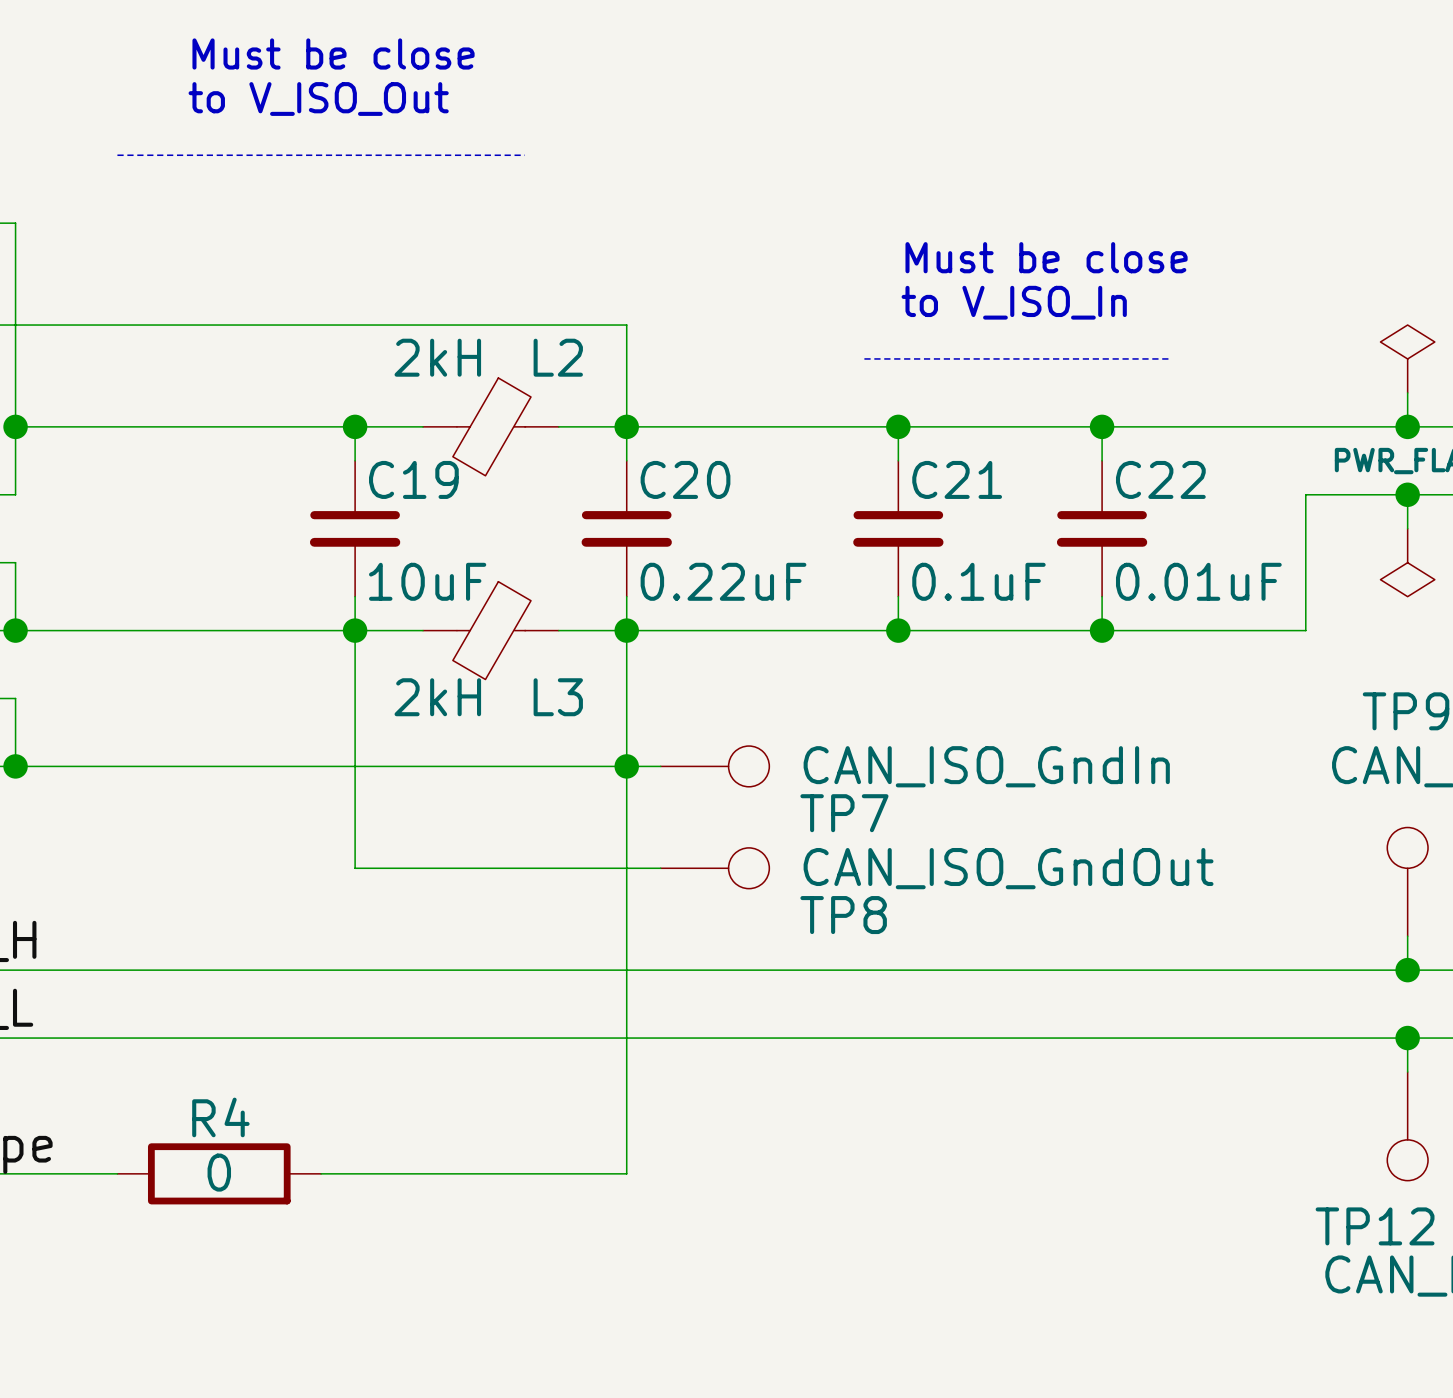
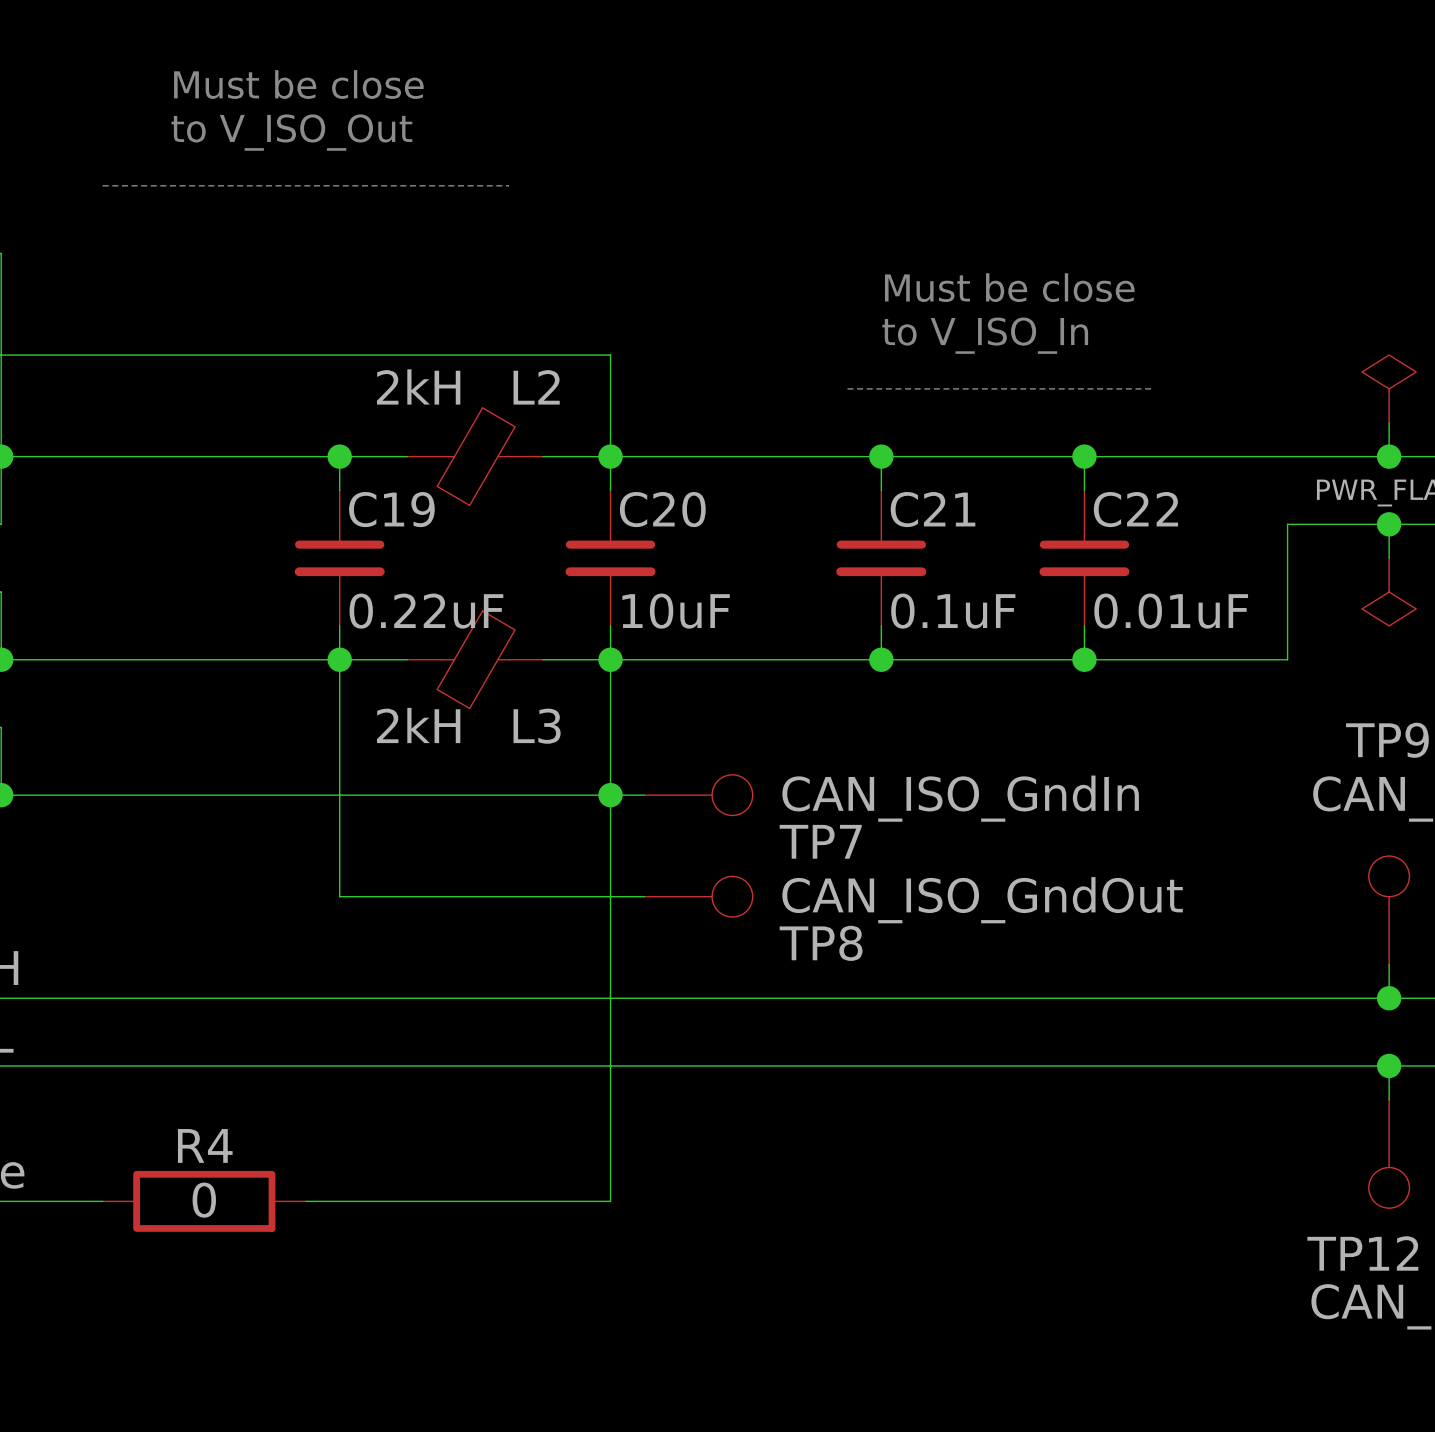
C19 value: 10uF (427, 581) -> 0.22uF (426, 611)
C20 value: 0.22uF (723, 581) -> 10uF (676, 611)

